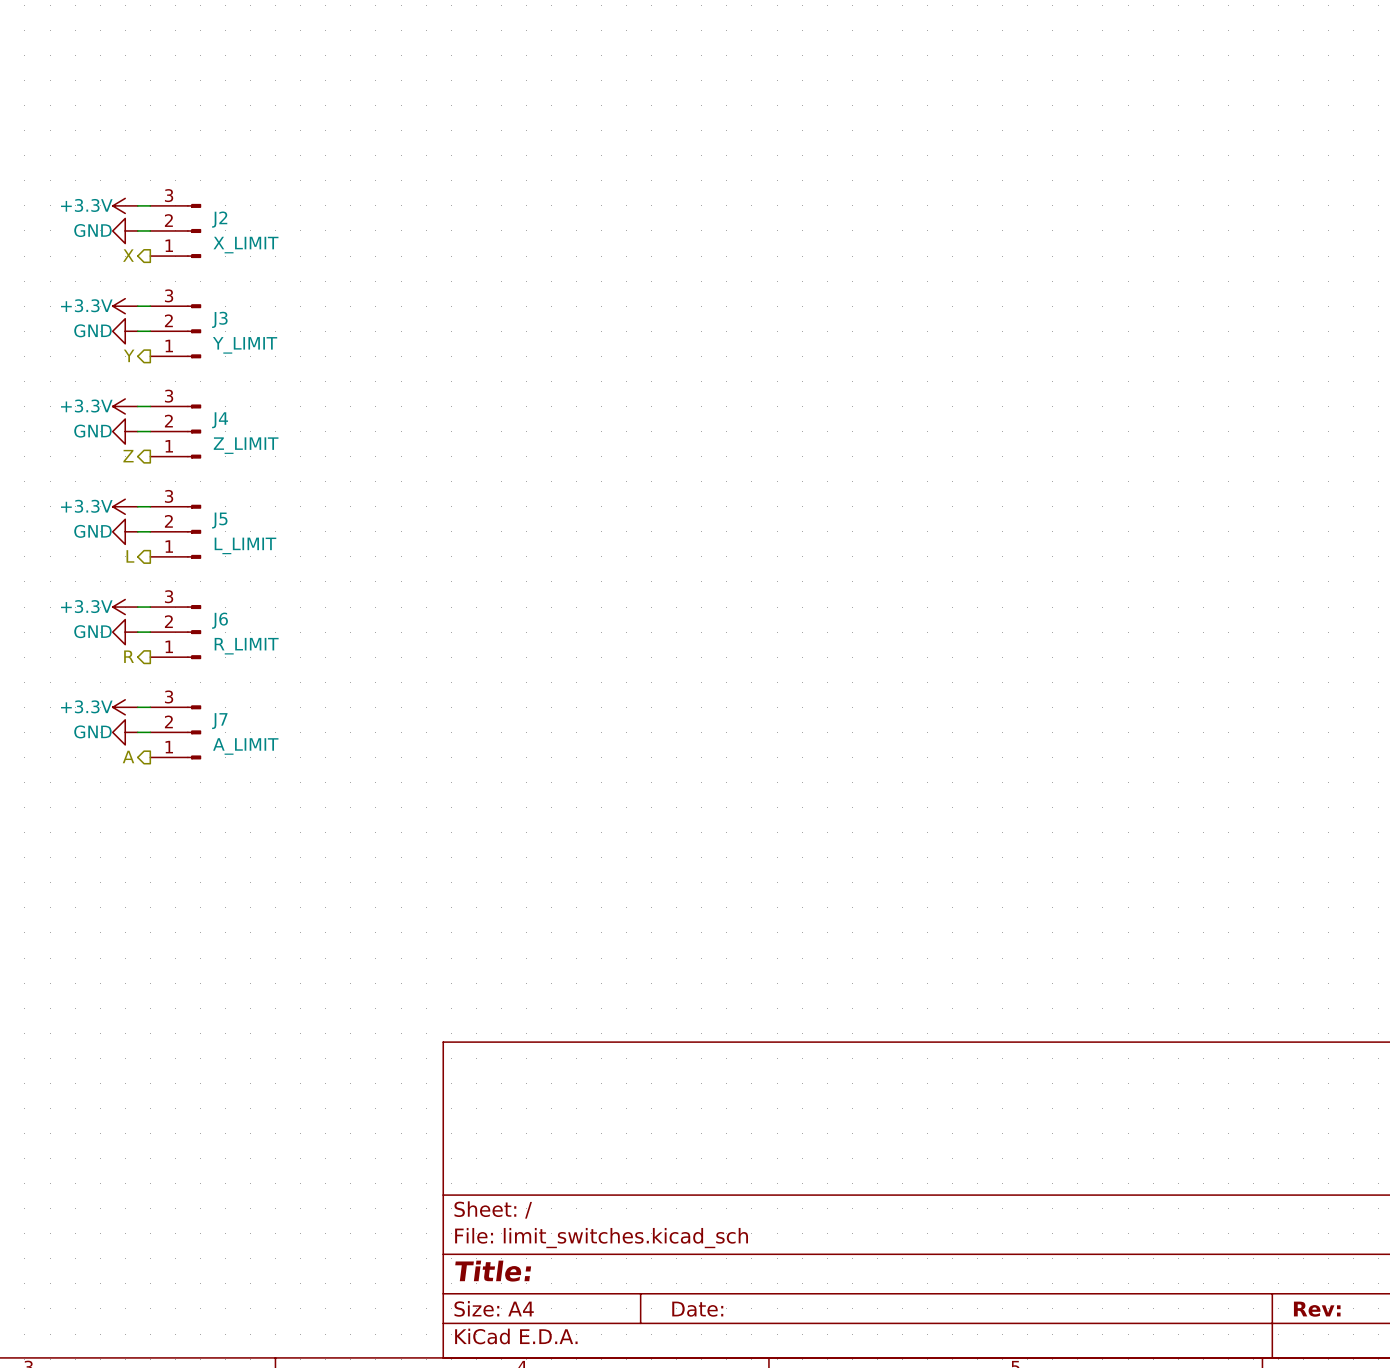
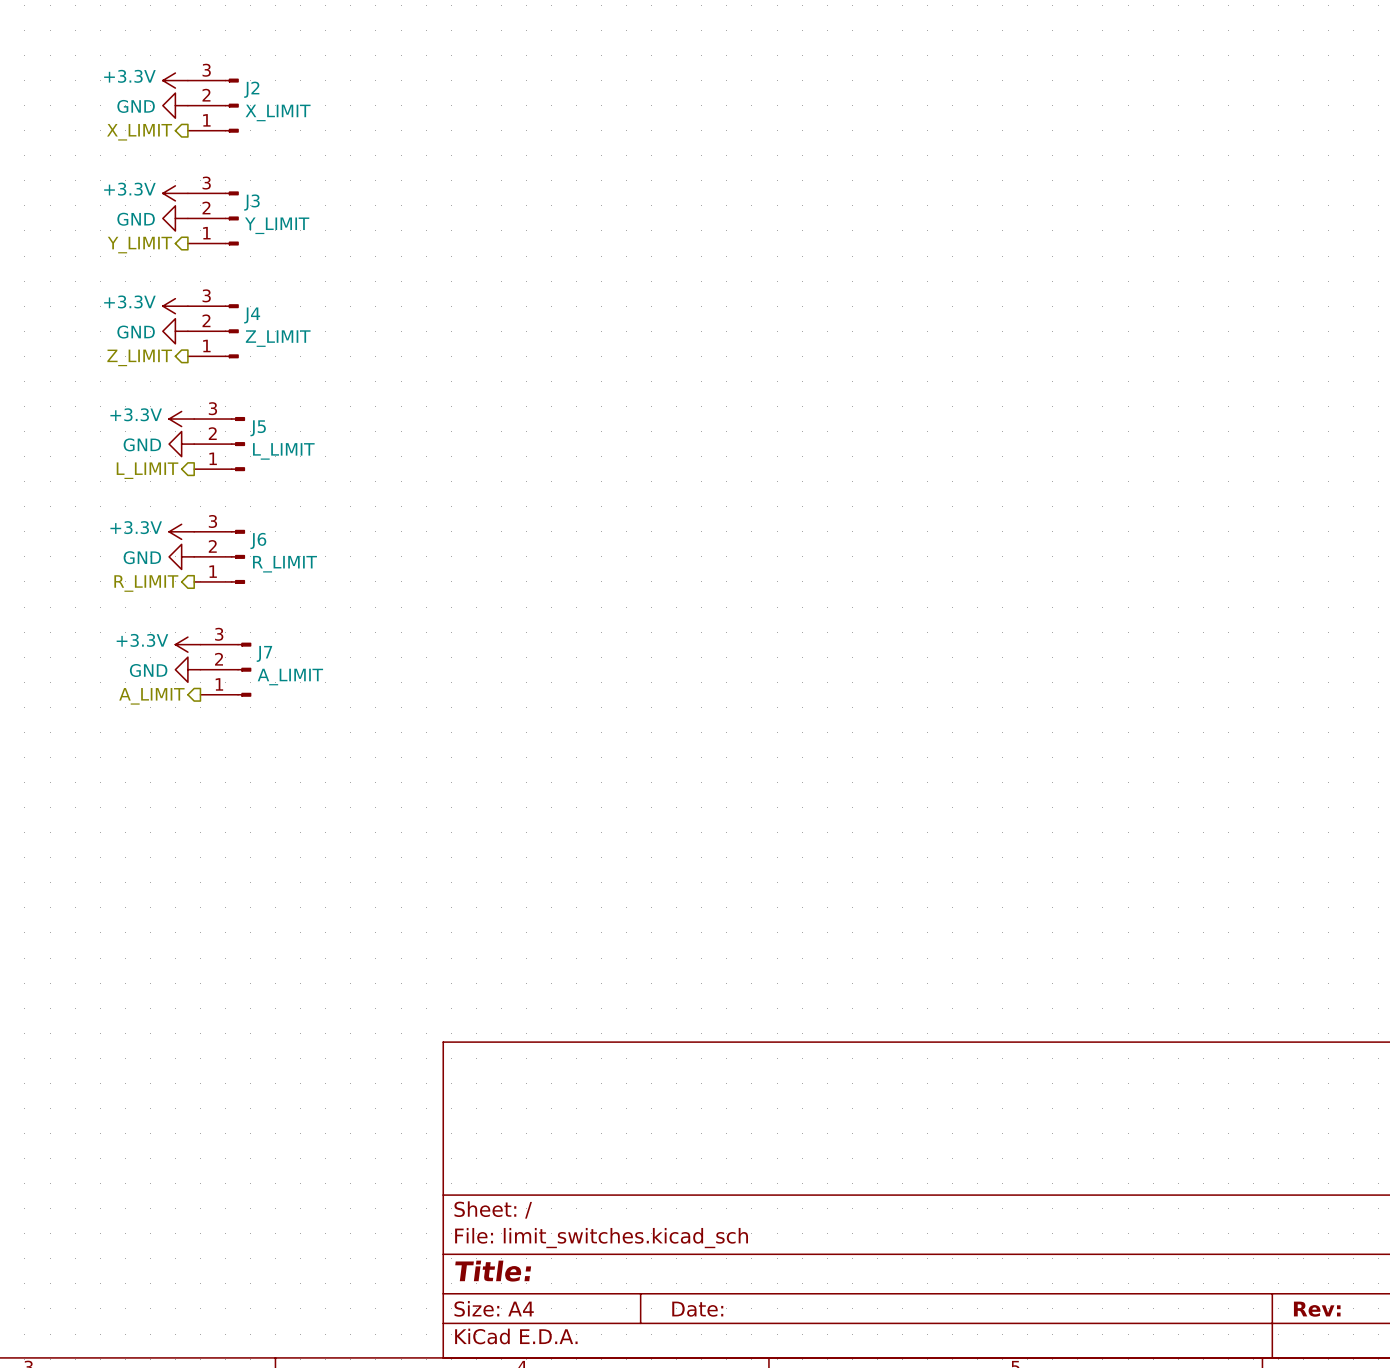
power symbol: none -> +3.3V (175, 80)
power symbol: none -> GND (175, 105)
hierarchical label: none -> X_LIMIT (139, 132)
power symbol text position: +3.3V (86, 205) -> +3.3V (129, 189)
power symbol position: +3.3V (125, 205) -> +3.3V (175, 193)
wire: (137, 205) (150, 205) -> none
J2 name position: J2 (219, 219) -> J2 (251, 89)
power symbol text position: GND (92, 230) -> GND (136, 219)
power symbol position: GND (125, 230) -> GND (175, 218)
wire: (137, 230) (150, 230) -> none
J2 position: (175, 230) -> (213, 105)
hierarchical label: none -> Y_LIMIT (139, 245)
J2 value position: X_LIMIT (245, 245) -> X_LIMIT (278, 112)
hierarchical label: X (128, 255) -> none
power symbol text position: +3.3V (86, 305) -> +3.3V (129, 301)
power symbol position: +3.3V (125, 306) -> +3.3V (175, 306)
wire: (137, 306) (150, 306) -> none
J3 name position: J3 (219, 319) -> J3 (251, 202)
power symbol text position: GND (92, 330) -> GND (136, 332)
power symbol position: GND (125, 331) -> GND (175, 331)
wire: (137, 331) (150, 331) -> none
J3 position: (175, 331) -> (213, 218)
J3 value position: Y_LIMIT (245, 345) -> Y_LIMIT (277, 225)
hierarchical label: Y (129, 355) -> none
hierarchical label: none -> Z_LIMIT (139, 357)
power symbol: +3.3V (125, 406) -> none
wire: (137, 406) (150, 406) -> none
power symbol: none -> +3.3V (181, 419)
J4 name position: J4 (220, 420) -> J4 (252, 315)
power symbol: GND (125, 431) -> none
wire: (137, 431) (150, 431) -> none
J4 position: (175, 431) -> (213, 331)
power symbol: none -> GND (181, 444)
J4 value position: Z_LIMIT (246, 445) -> Z_LIMIT (278, 338)
hierarchical label: Z (128, 456) -> none
hierarchical label: none -> L_LIMIT (147, 470)
power symbol: +3.3V (125, 506) -> none
wire: (137, 506) (150, 506) -> none
J5 name position: J5 (219, 520) -> J5 (258, 428)
power symbol: GND (125, 531) -> none
wire: (137, 531) (150, 531) -> none
J5 position: (175, 531) -> (219, 444)
power symbol: none -> +3.3V (181, 531)
J5 value position: L_LIMIT (245, 545) -> L_LIMIT (283, 451)
hierarchical label: L (130, 556) -> none
power symbol: none -> GND (181, 556)
hierarchical label: none -> R_LIMIT (146, 583)
power symbol: +3.3V (125, 607) -> none
wire: (137, 607) (150, 607) -> none
J6 name position: J6 (220, 620) -> J6 (258, 540)
power symbol: GND (125, 632) -> none
wire: (137, 632) (150, 632) -> none
J6 position: (175, 632) -> (219, 556)
power symbol: none -> +3.3V (187, 644)
J6 value position: R_LIMIT (246, 646) -> R_LIMIT (285, 564)
hierarchical label: R (129, 656) -> none
power symbol: none -> GND (187, 669)
hierarchical label: none -> A_LIMIT (151, 696)
power symbol: +3.3V (125, 707) -> none
wire: (137, 707) (150, 707) -> none
J7 name position: J7 (219, 721) -> J7 (264, 653)
power symbol: GND (125, 732) -> none
wire: (137, 732) (150, 732) -> none
J7 position: (175, 732) -> (225, 669)
J7 value position: A_LIMIT (245, 746) -> A_LIMIT (290, 677)
hierarchical label: A (128, 756) -> none

